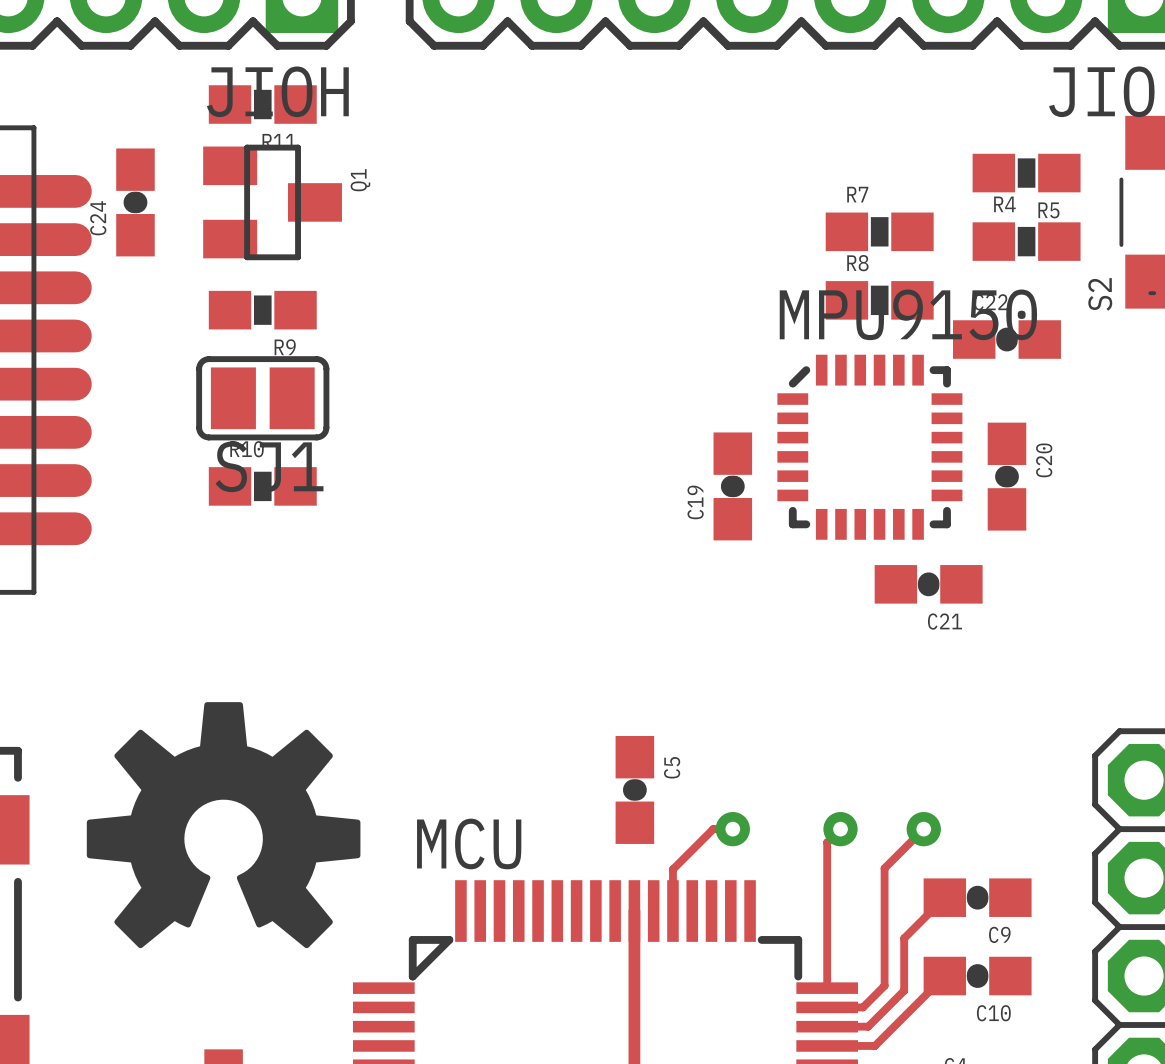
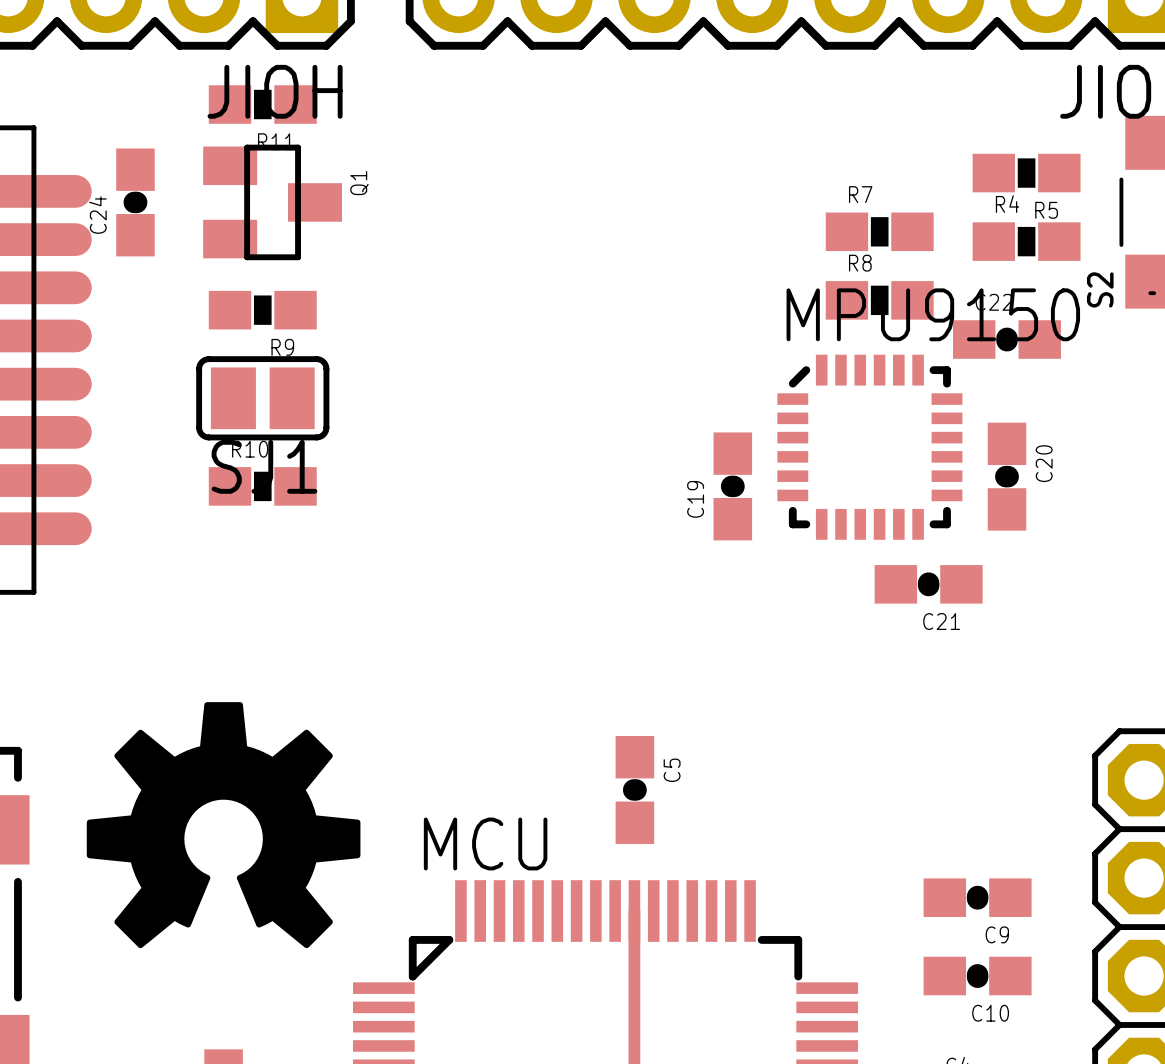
track: (732, 829) (713, 829) (672, 869) (672, 911) -> none
via: (732, 829) -> none
track: (840, 829) (827, 842) (827, 988) -> none
via: (840, 829) -> none
track: (923, 829) (884, 868) (884, 985) (862, 1007) (827, 1007) -> none
via: (923, 829) -> none
track: (944, 897) (904, 938) (904, 990) (868, 1026) (827, 1026) -> none
track: (944, 976) (874, 1045) (827, 1045) -> none

